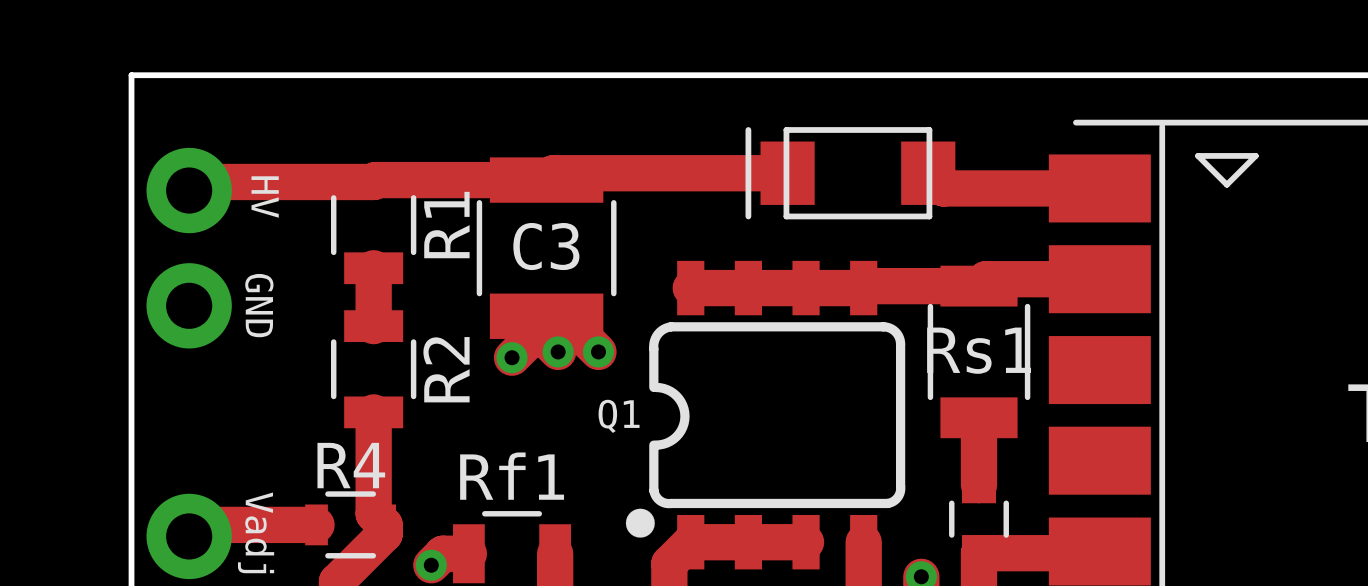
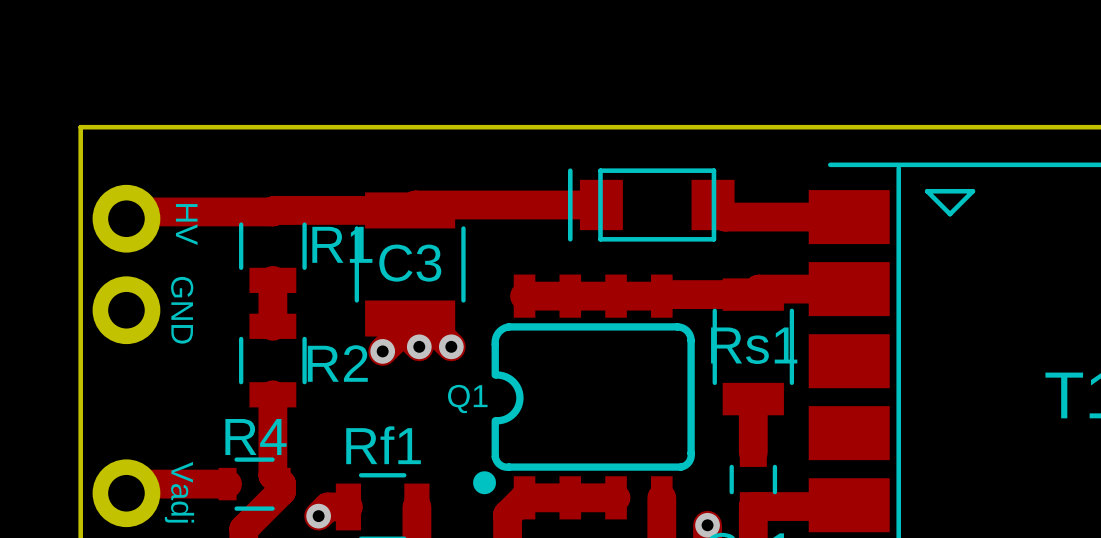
R1 name rotation: 0° (446, 225) -> 90° clockwise (342, 244)
R2 name rotation: 0° (446, 369) -> 90° clockwise (337, 363)

